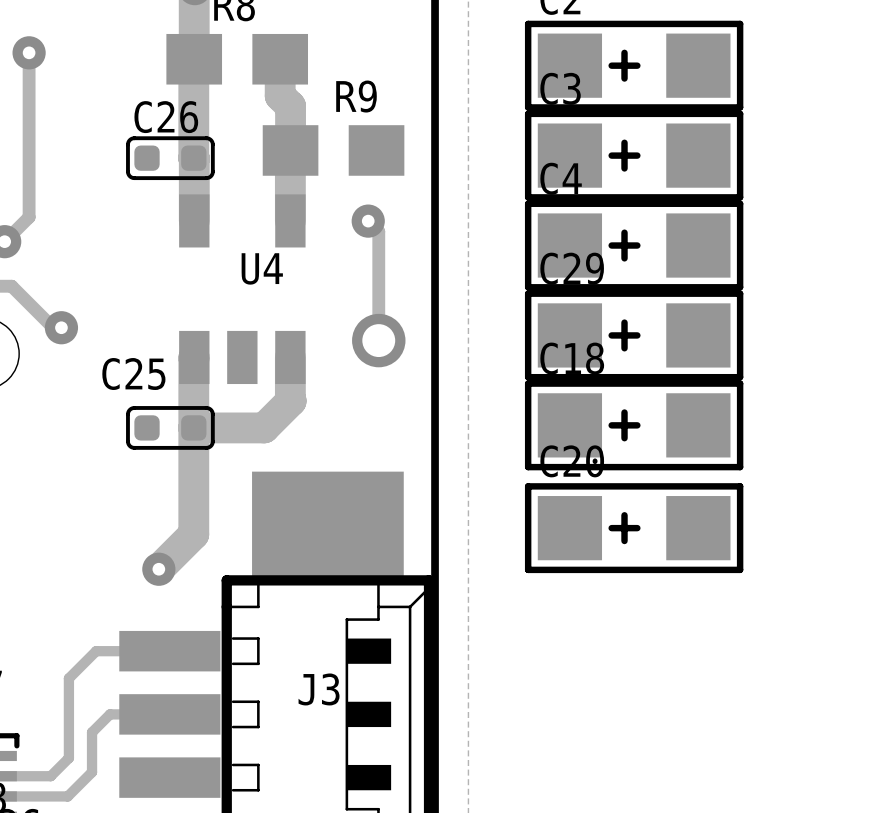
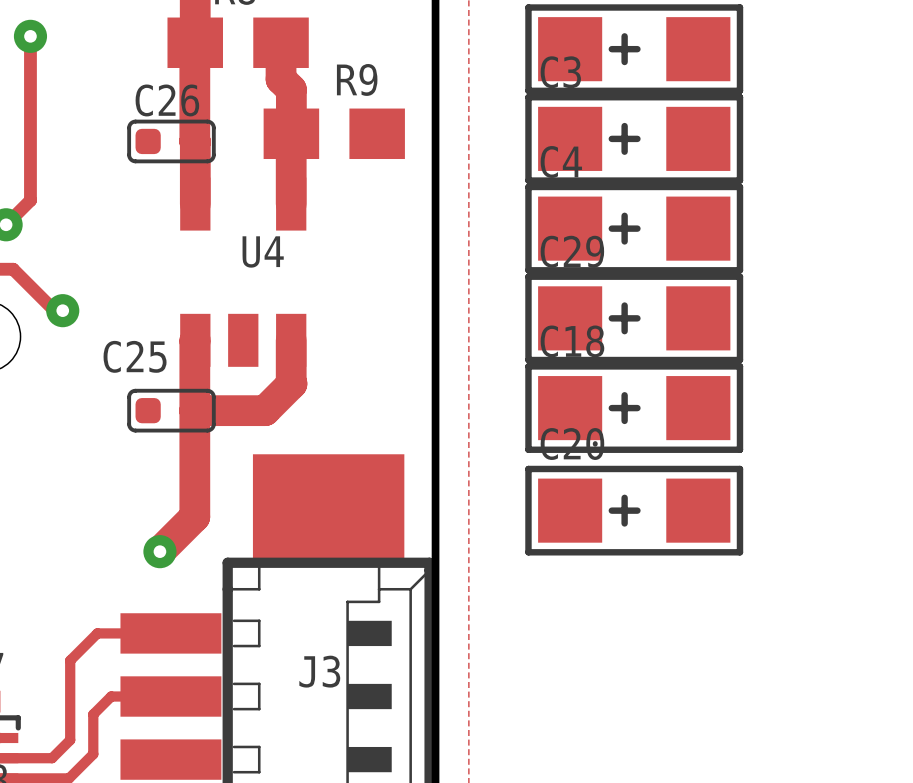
track: (368, 221) (378, 231) (378, 340) -> none
via: (368, 221) -> none
via: (378, 340) -> none

